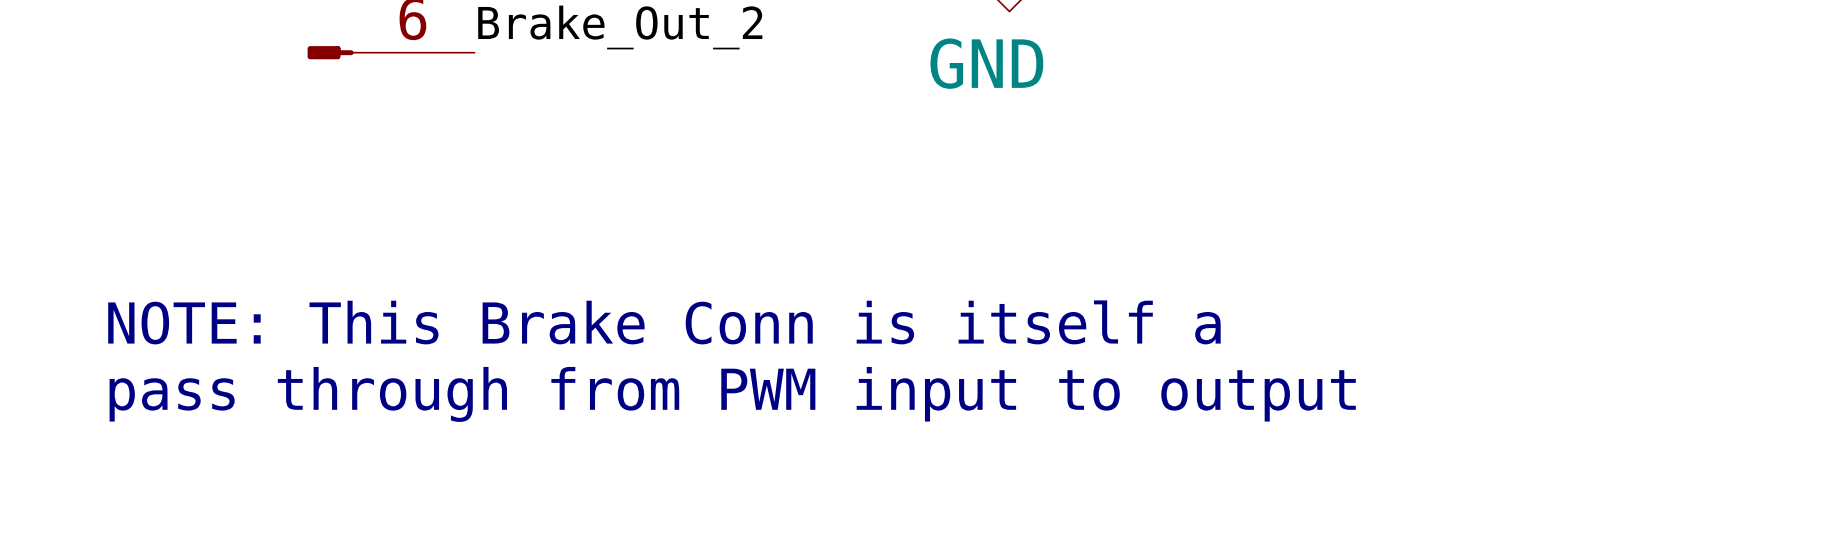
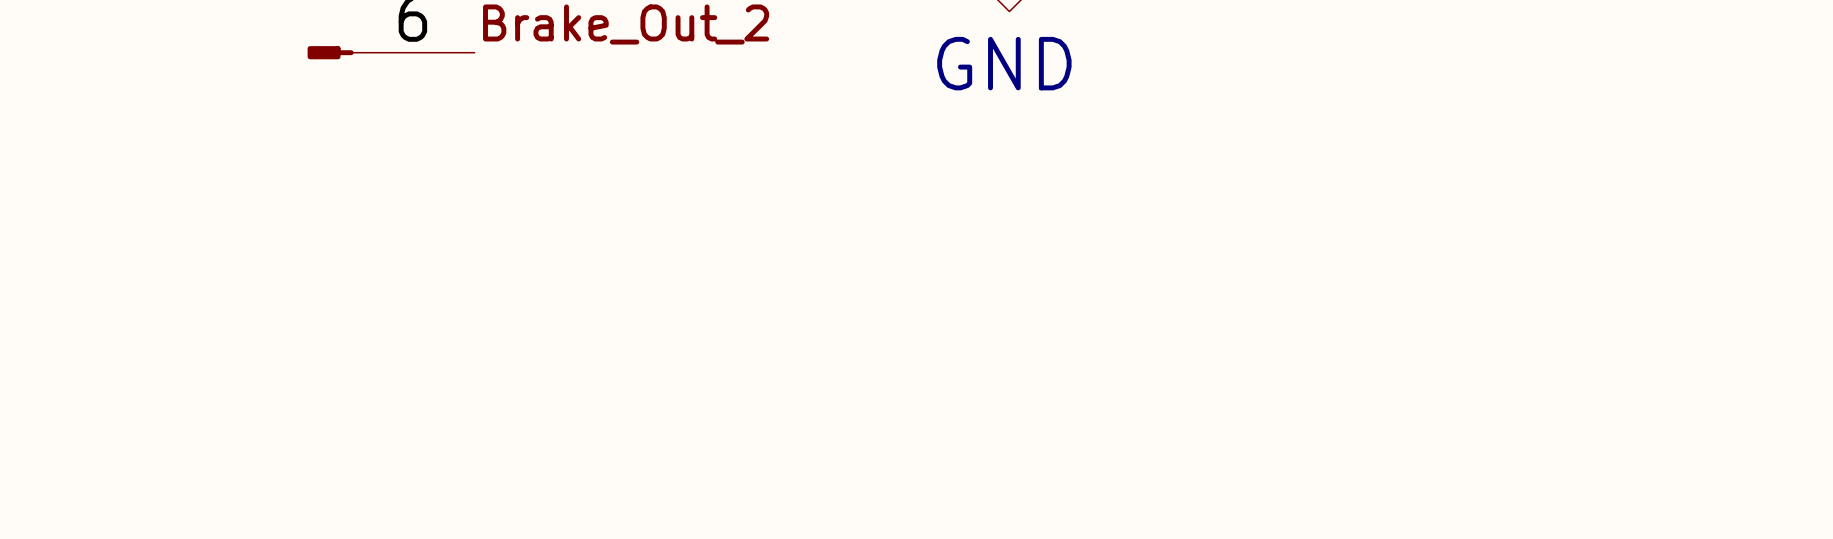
text: NOTE: This Brake Conn is itself a (664, 322) -> none
text: pass through from PWM input to output (732, 394) -> none

